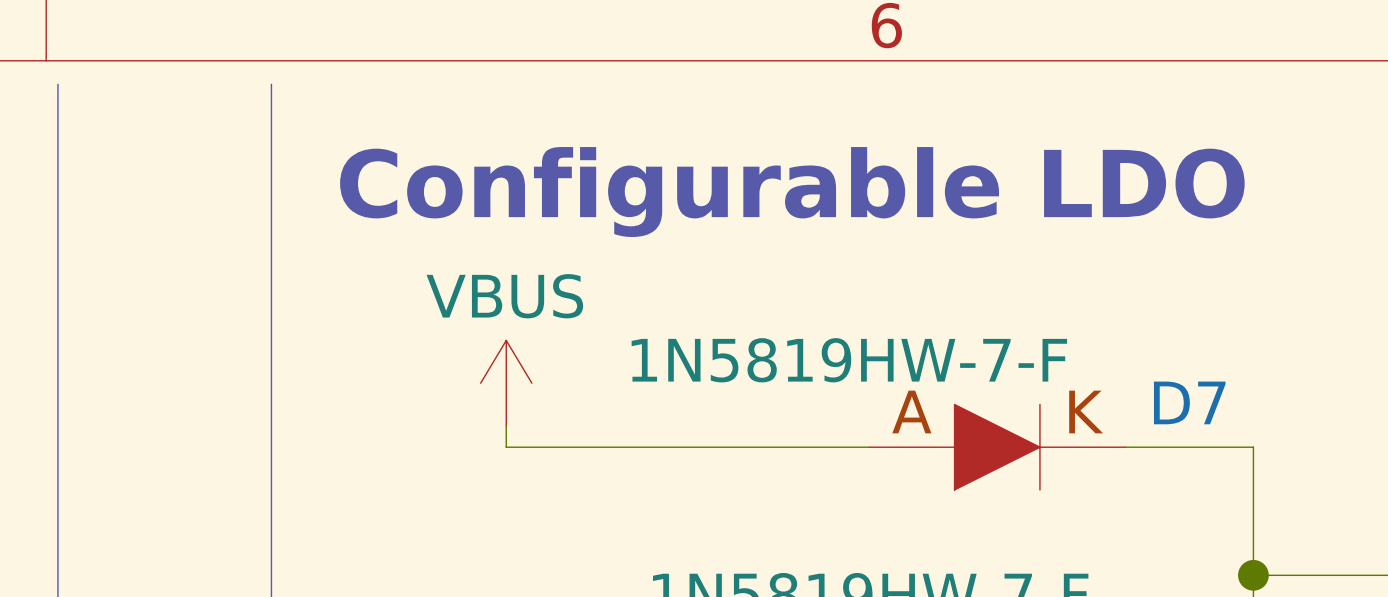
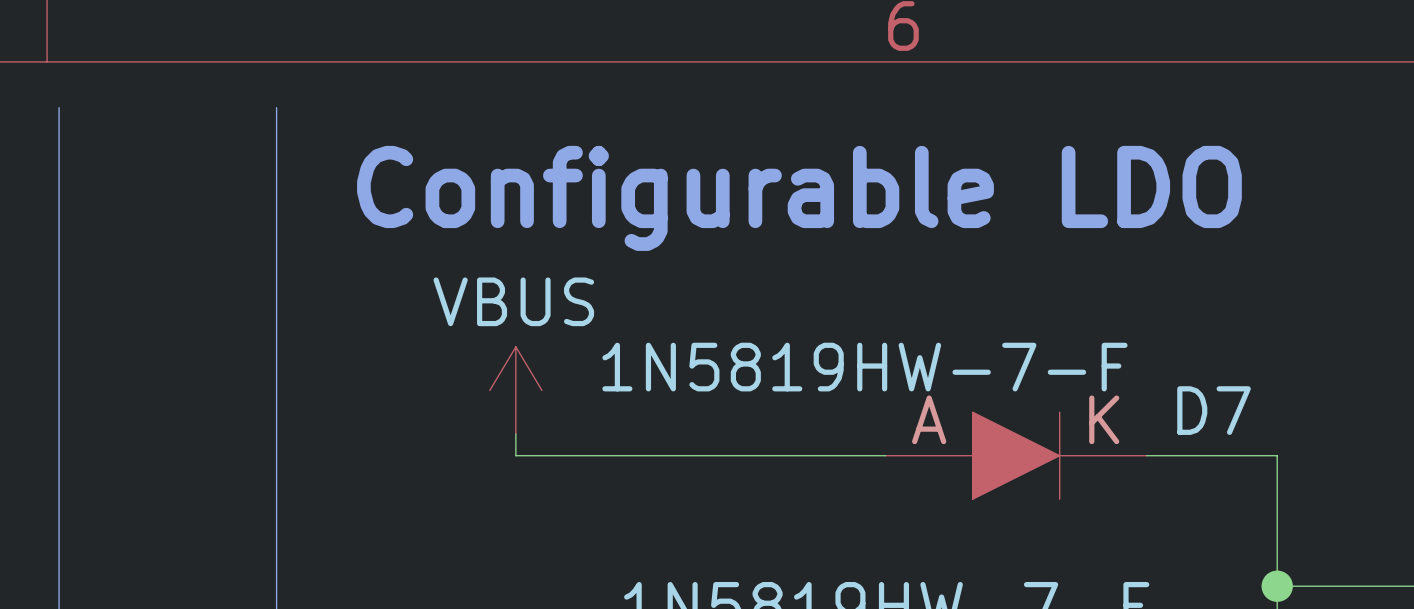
line: (57, 84) (57, 105) -> none
line: (271, 84) (271, 105) -> none

